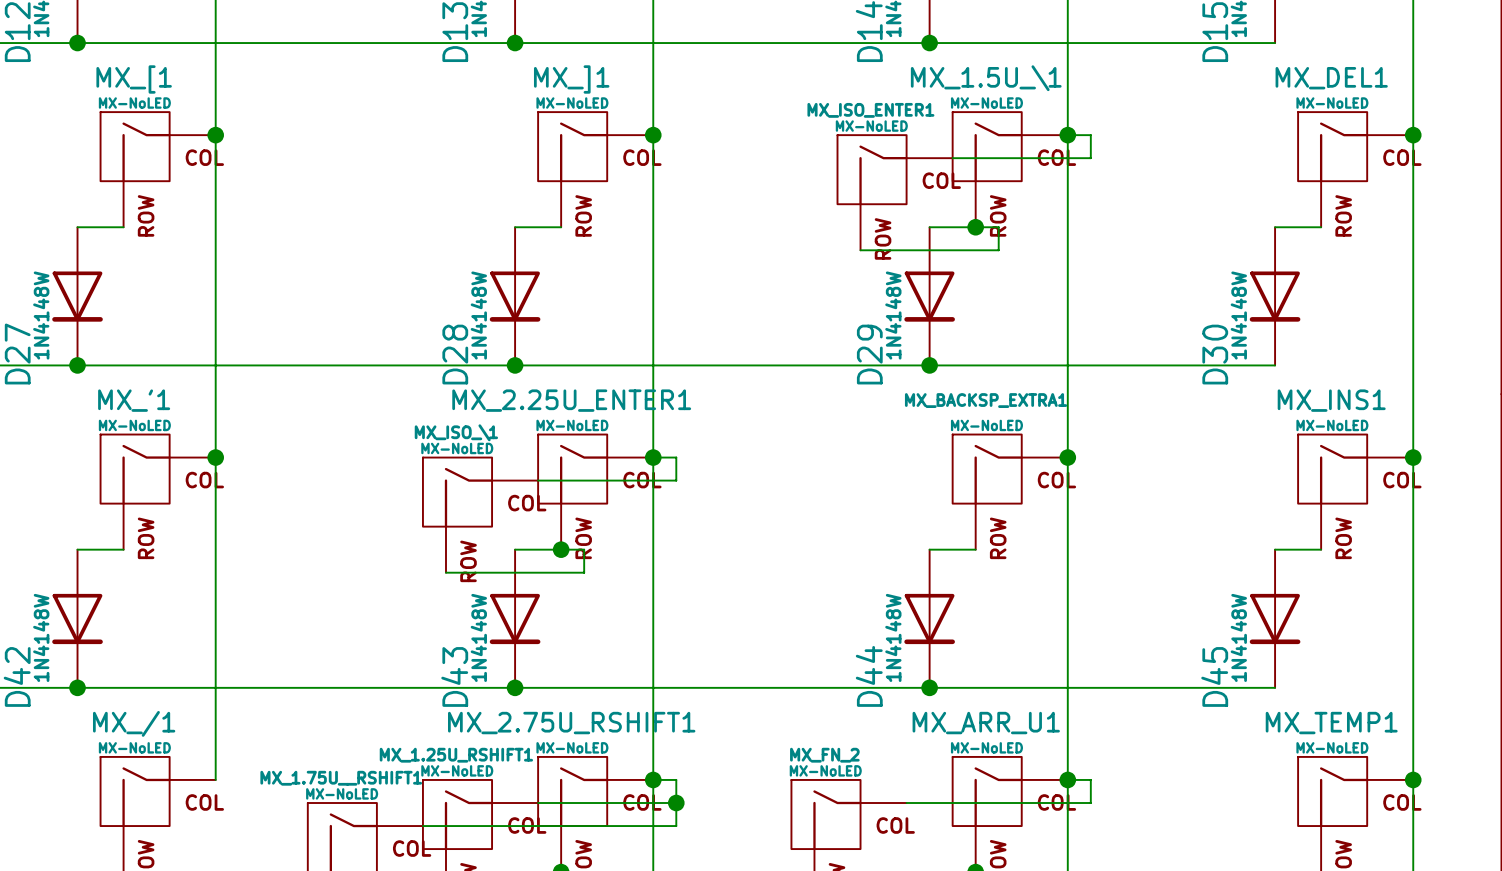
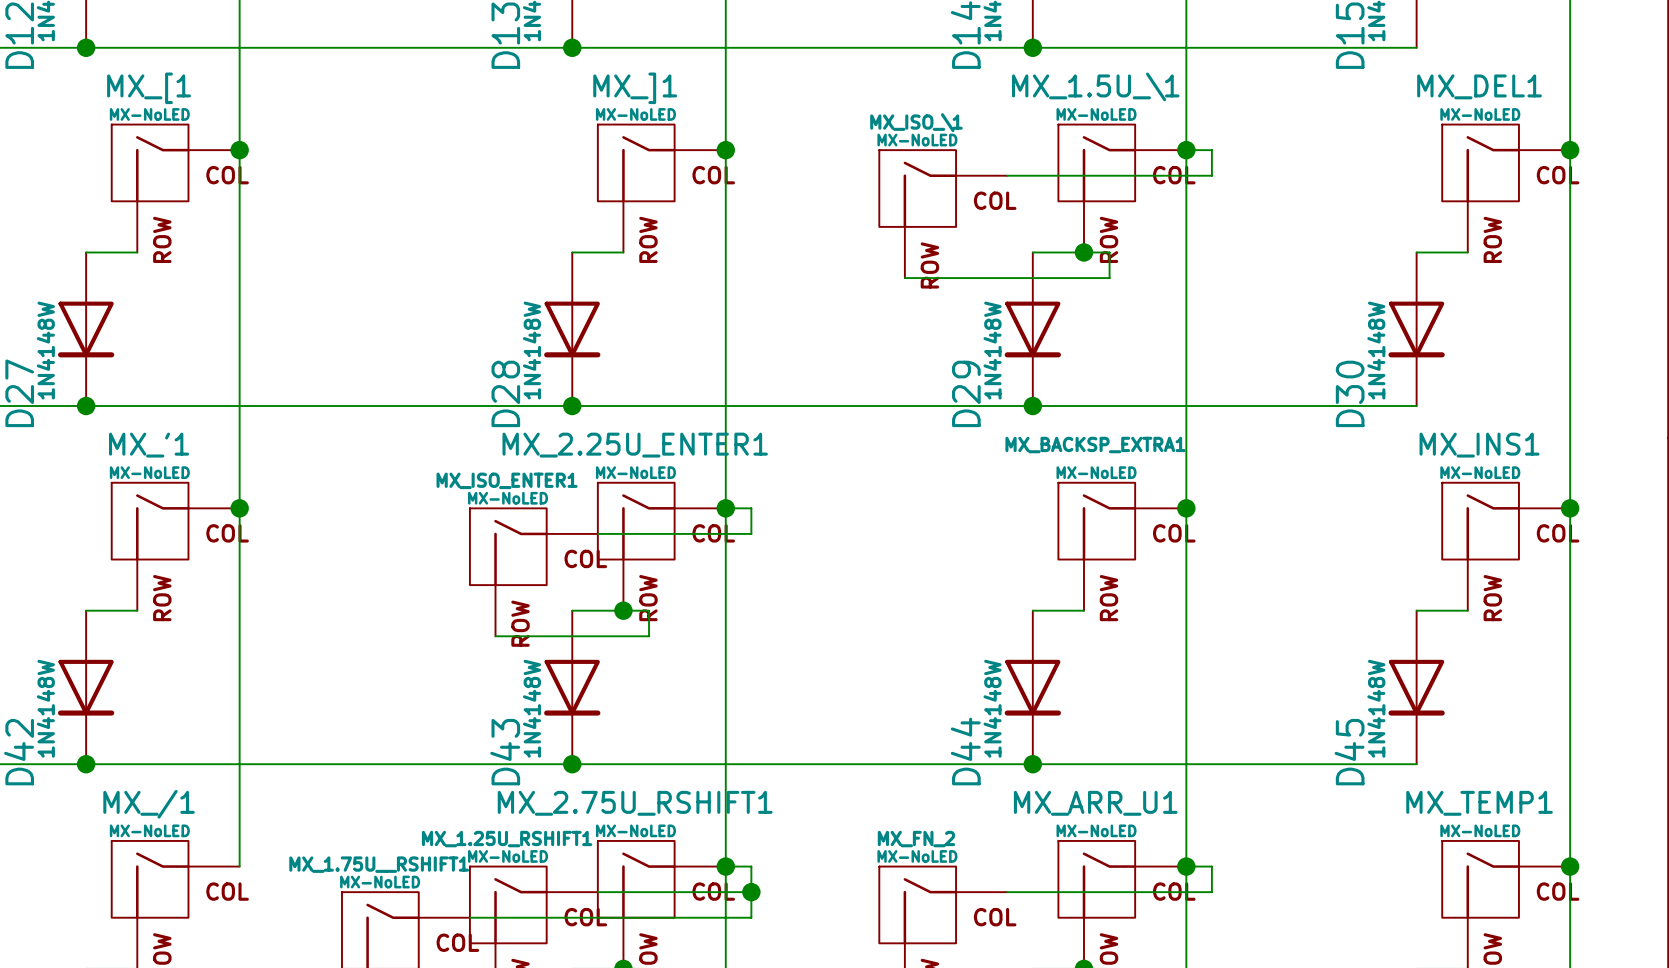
MX_ISO_\1: none -> MX-NoLED (943, 214)
MX_ISO_ENTER1: MX-NoLED (895, 192) -> none
wire: none -> (904, 278) (956, 278)
MX_ISO_\1 name: MX_ISO_\1 (456, 432) -> MX_ISO_ENTER1 (507, 480)

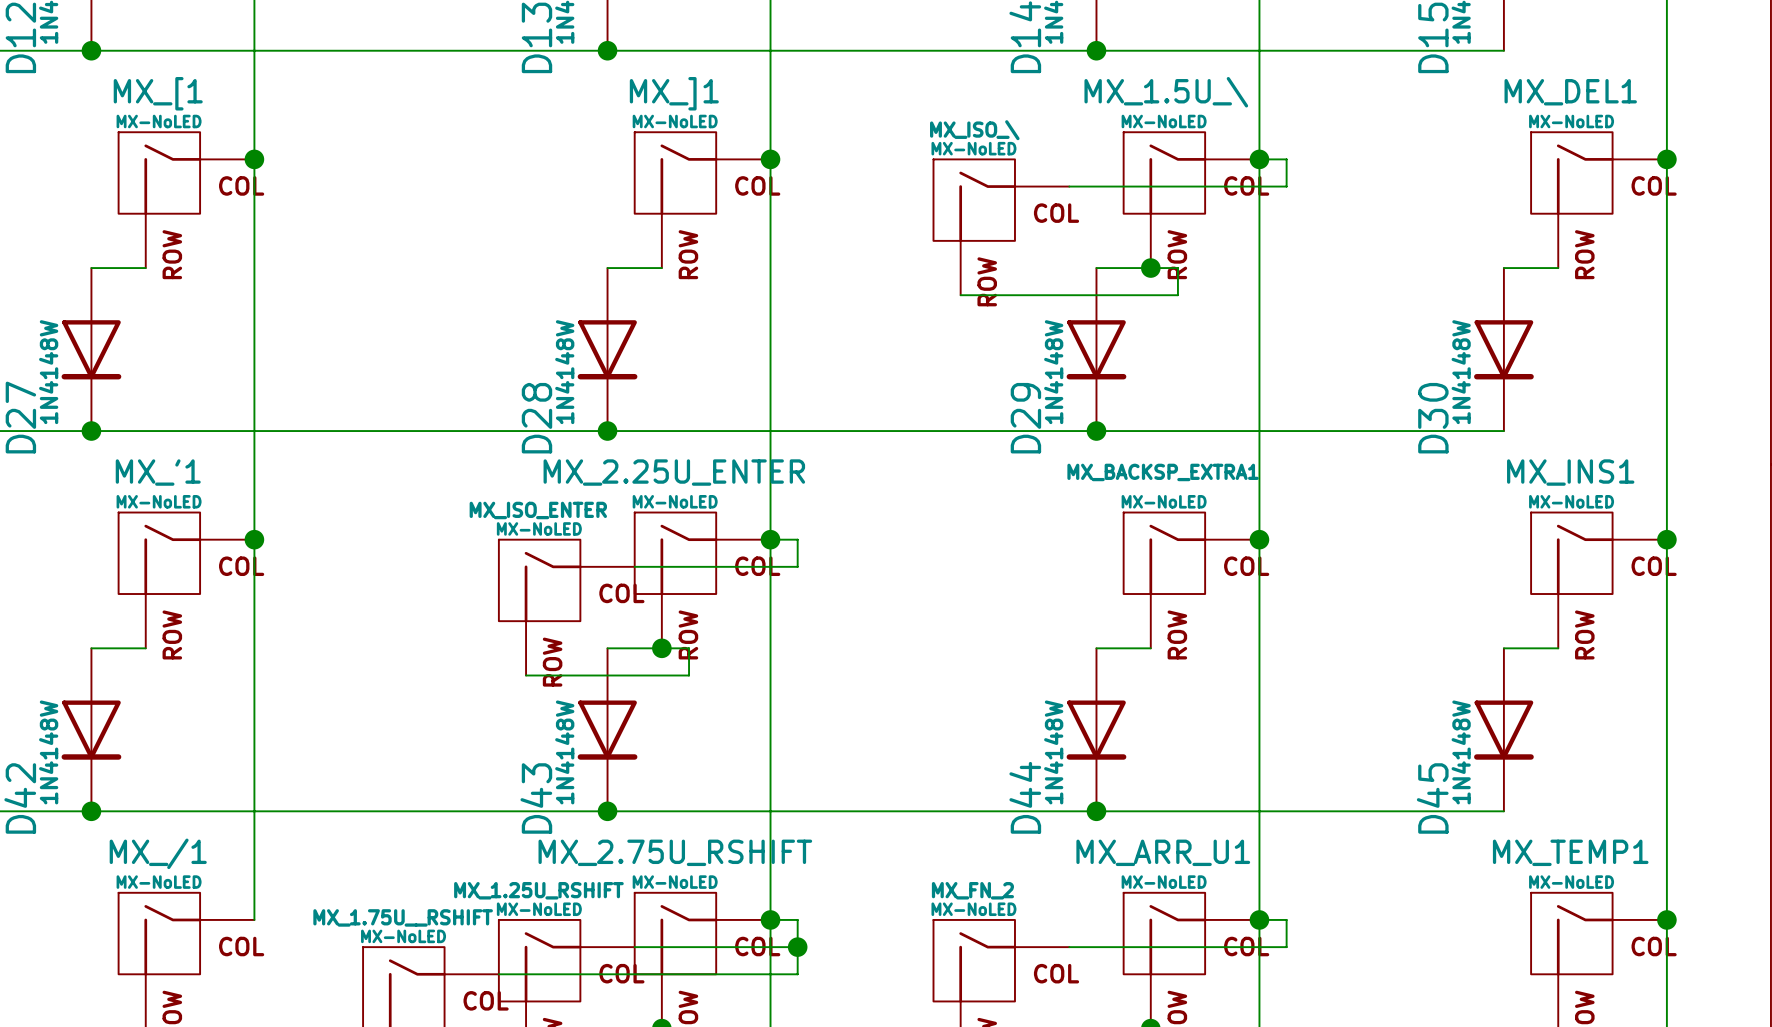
MX_1.5U_\1 name: MX_1.5U_\1 (1095, 86) -> MX_1.5U_\ (1166, 92)
MX_ISO_\1 name: MX_ISO_\1 (916, 122) -> MX_ISO_\ (974, 130)
MX_2.25U_ENTER1 name: MX_2.25U_ENTER1 (635, 445) -> MX_2.25U_ENTER (674, 472)
MX_ISO_ENTER1 name: MX_ISO_ENTER1 (507, 480) -> MX_ISO_ENTER (538, 510)
MX_2.75U_RSHIFT1 name: MX_2.75U_RSHIFT1 (635, 803) -> MX_2.75U_RSHIFT (675, 852)
MX_1.25U_RSHIFT1 name: MX_1.25U_RSHIFT1 (507, 839) -> MX_1.25U_RSHIFT (538, 890)
MX_1.75U__RSHIFT1 name: MX_1.75U__RSHIFT1 (379, 864) -> MX_1.75U__RSHIFT (403, 917)

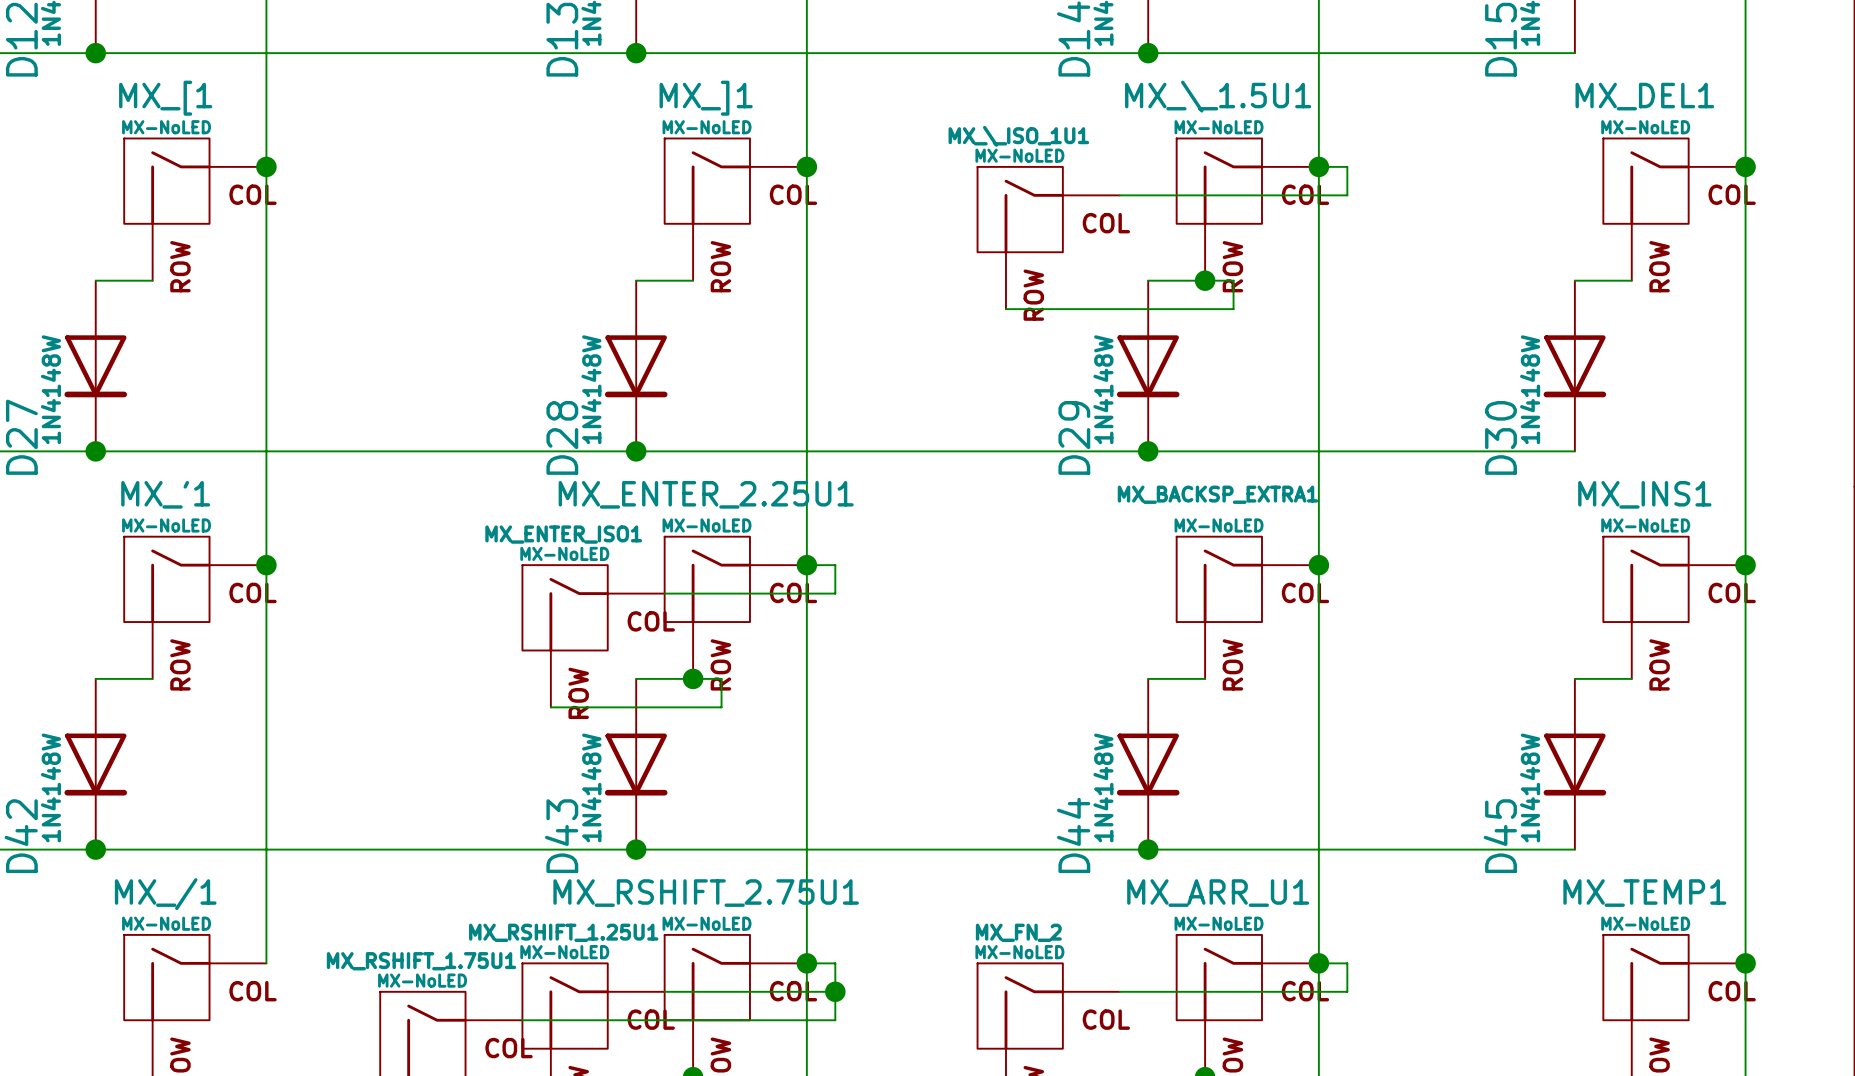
MX_1.5U_\ name: MX_1.5U_\ (1166, 92) -> MX_\_1.5U1 (1218, 96)
MX_ISO_\ name: MX_ISO_\ (974, 130) -> MX_\_ISO_1U1 (1018, 136)
MX_2.25U_ENTER name: MX_2.25U_ENTER (674, 472) -> MX_ENTER_2.25U1 (706, 494)
MX_ISO_ENTER name: MX_ISO_ENTER (538, 510) -> MX_ENTER_ISO1 (563, 534)
MX_2.75U_RSHIFT name: MX_2.75U_RSHIFT (675, 852) -> MX_RSHIFT_2.75U1 (706, 893)
MX_1.25U_RSHIFT name: MX_1.25U_RSHIFT (538, 890) -> MX_RSHIFT_1.25U1 (563, 932)
MX_1.75U__RSHIFT name: MX_1.75U__RSHIFT (403, 917) -> MX_RSHIFT_1.75U1 (421, 961)

